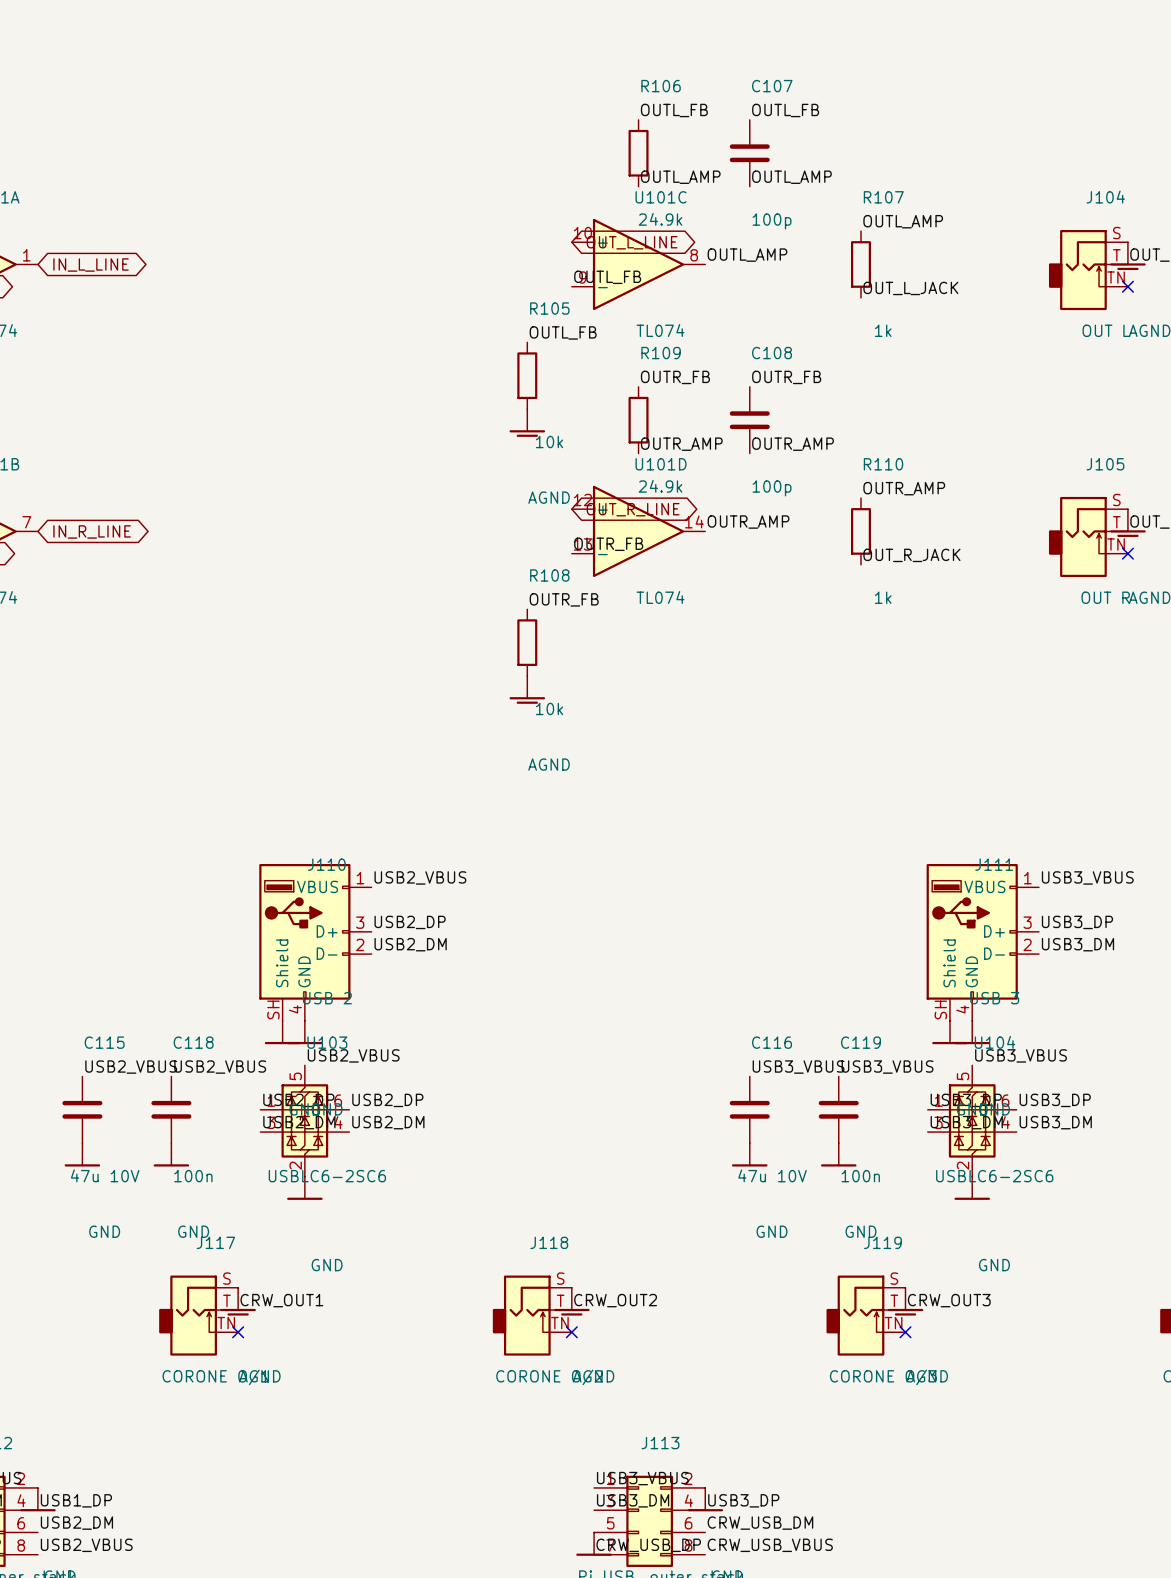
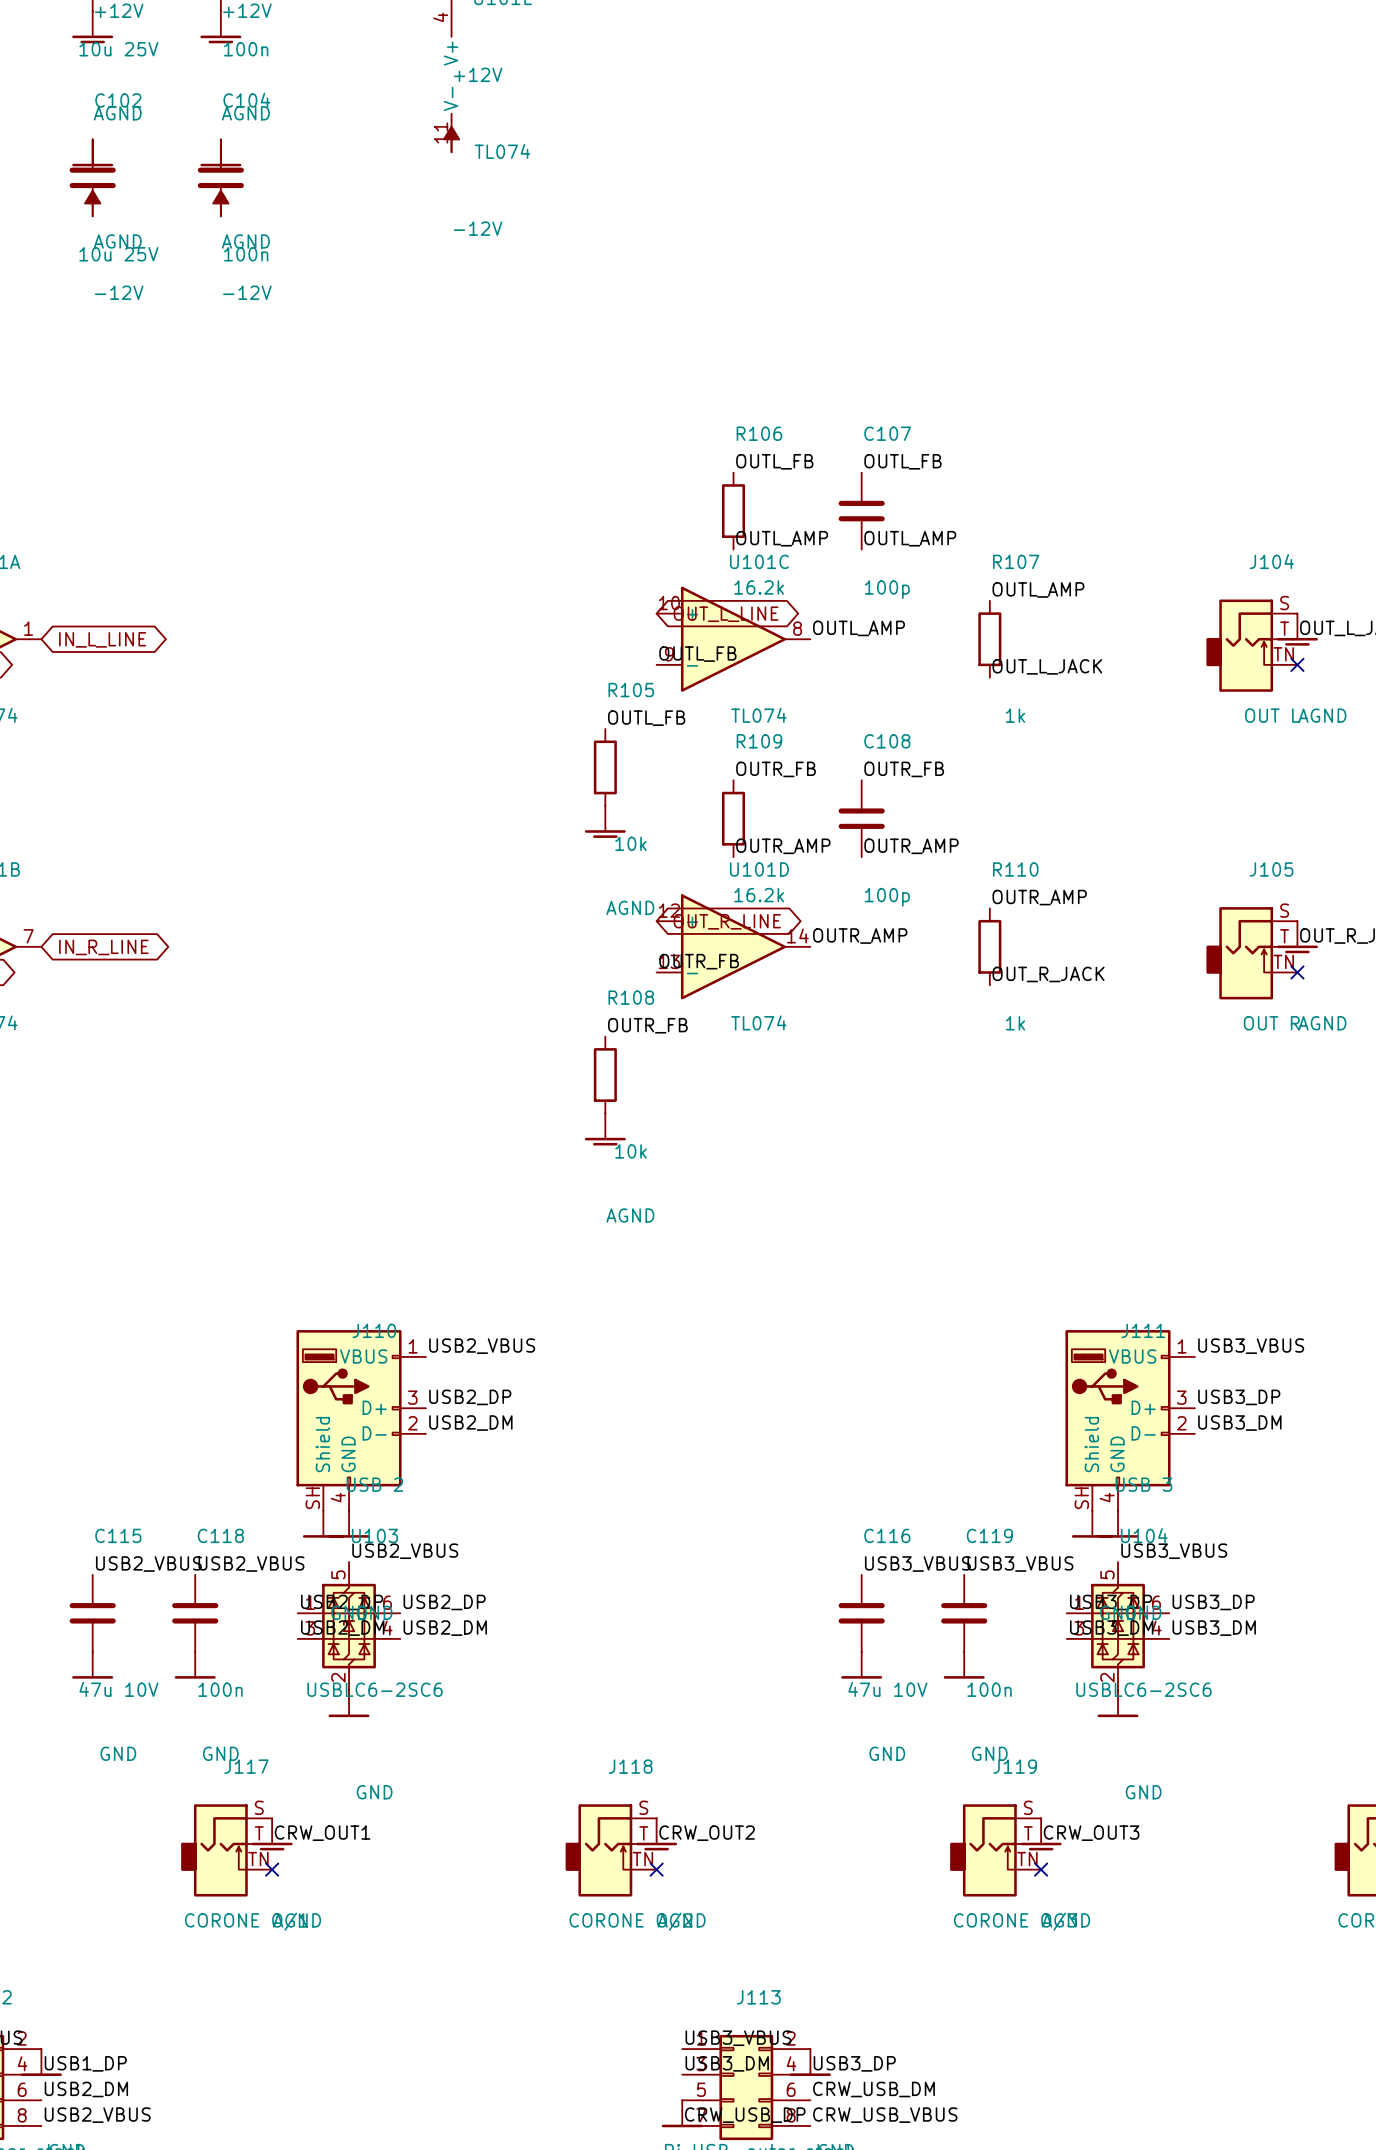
R106 value: 24.9k (660, 219) -> 16.2k (759, 587)
R109 value: 24.9k (660, 486) -> 16.2k (759, 895)

